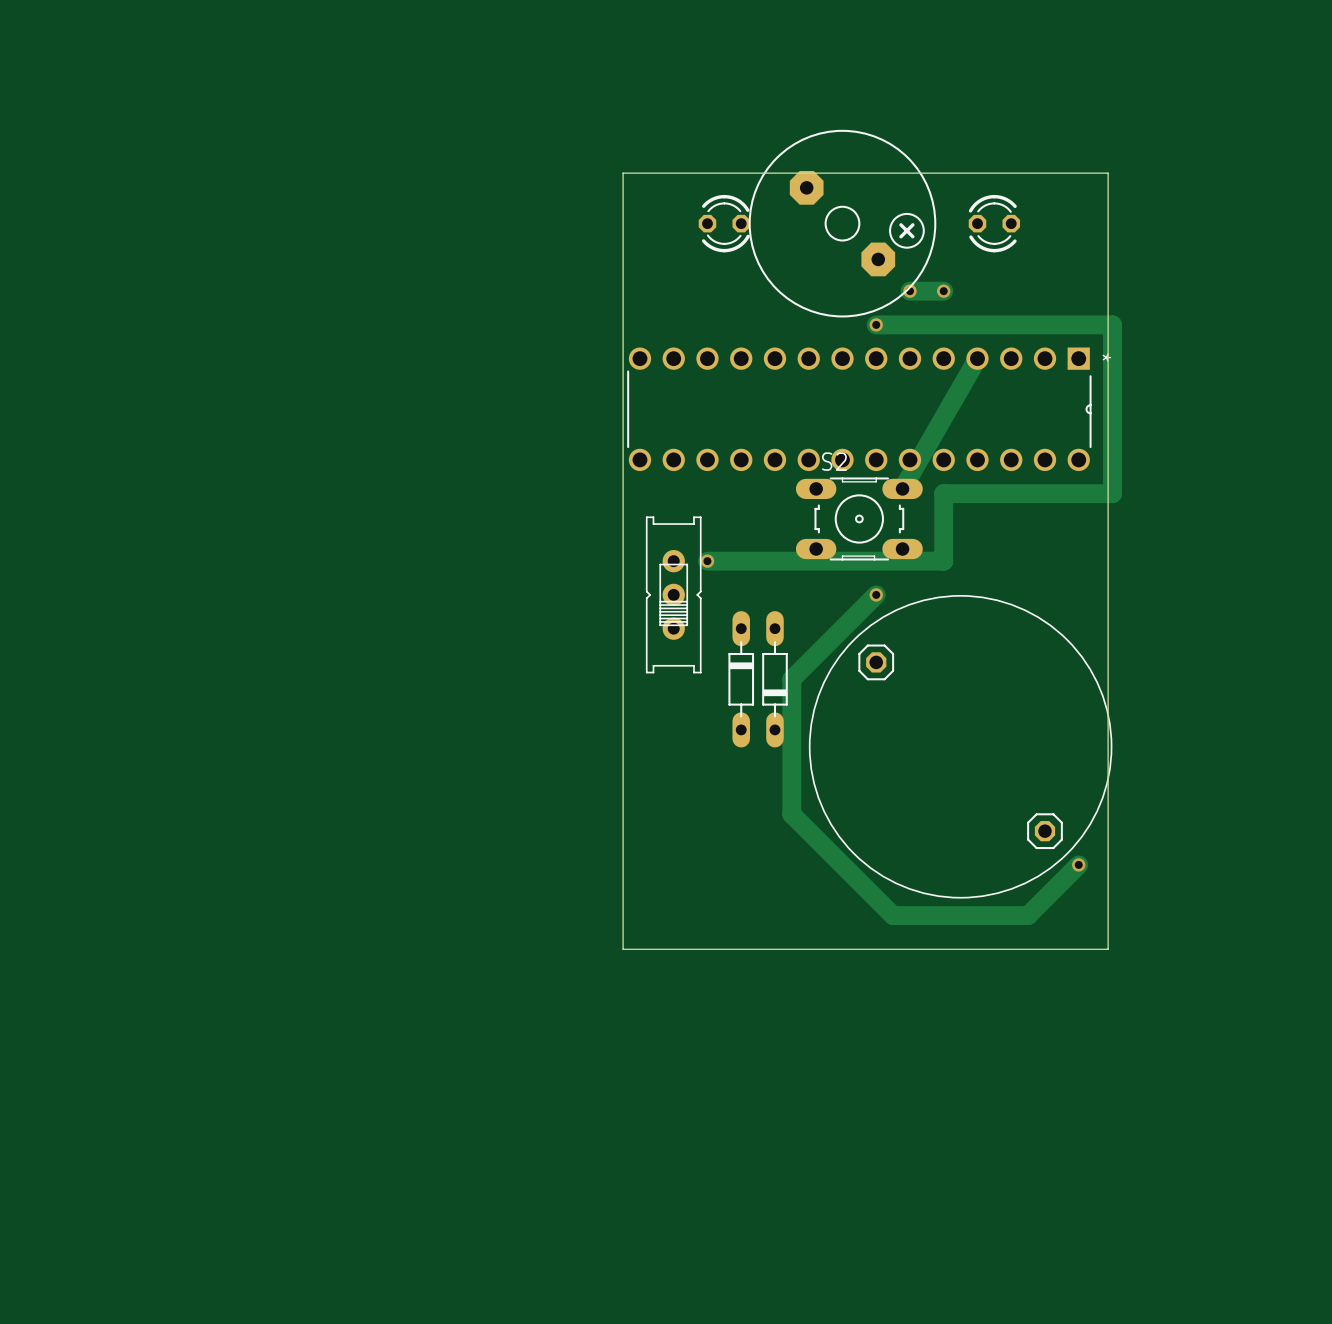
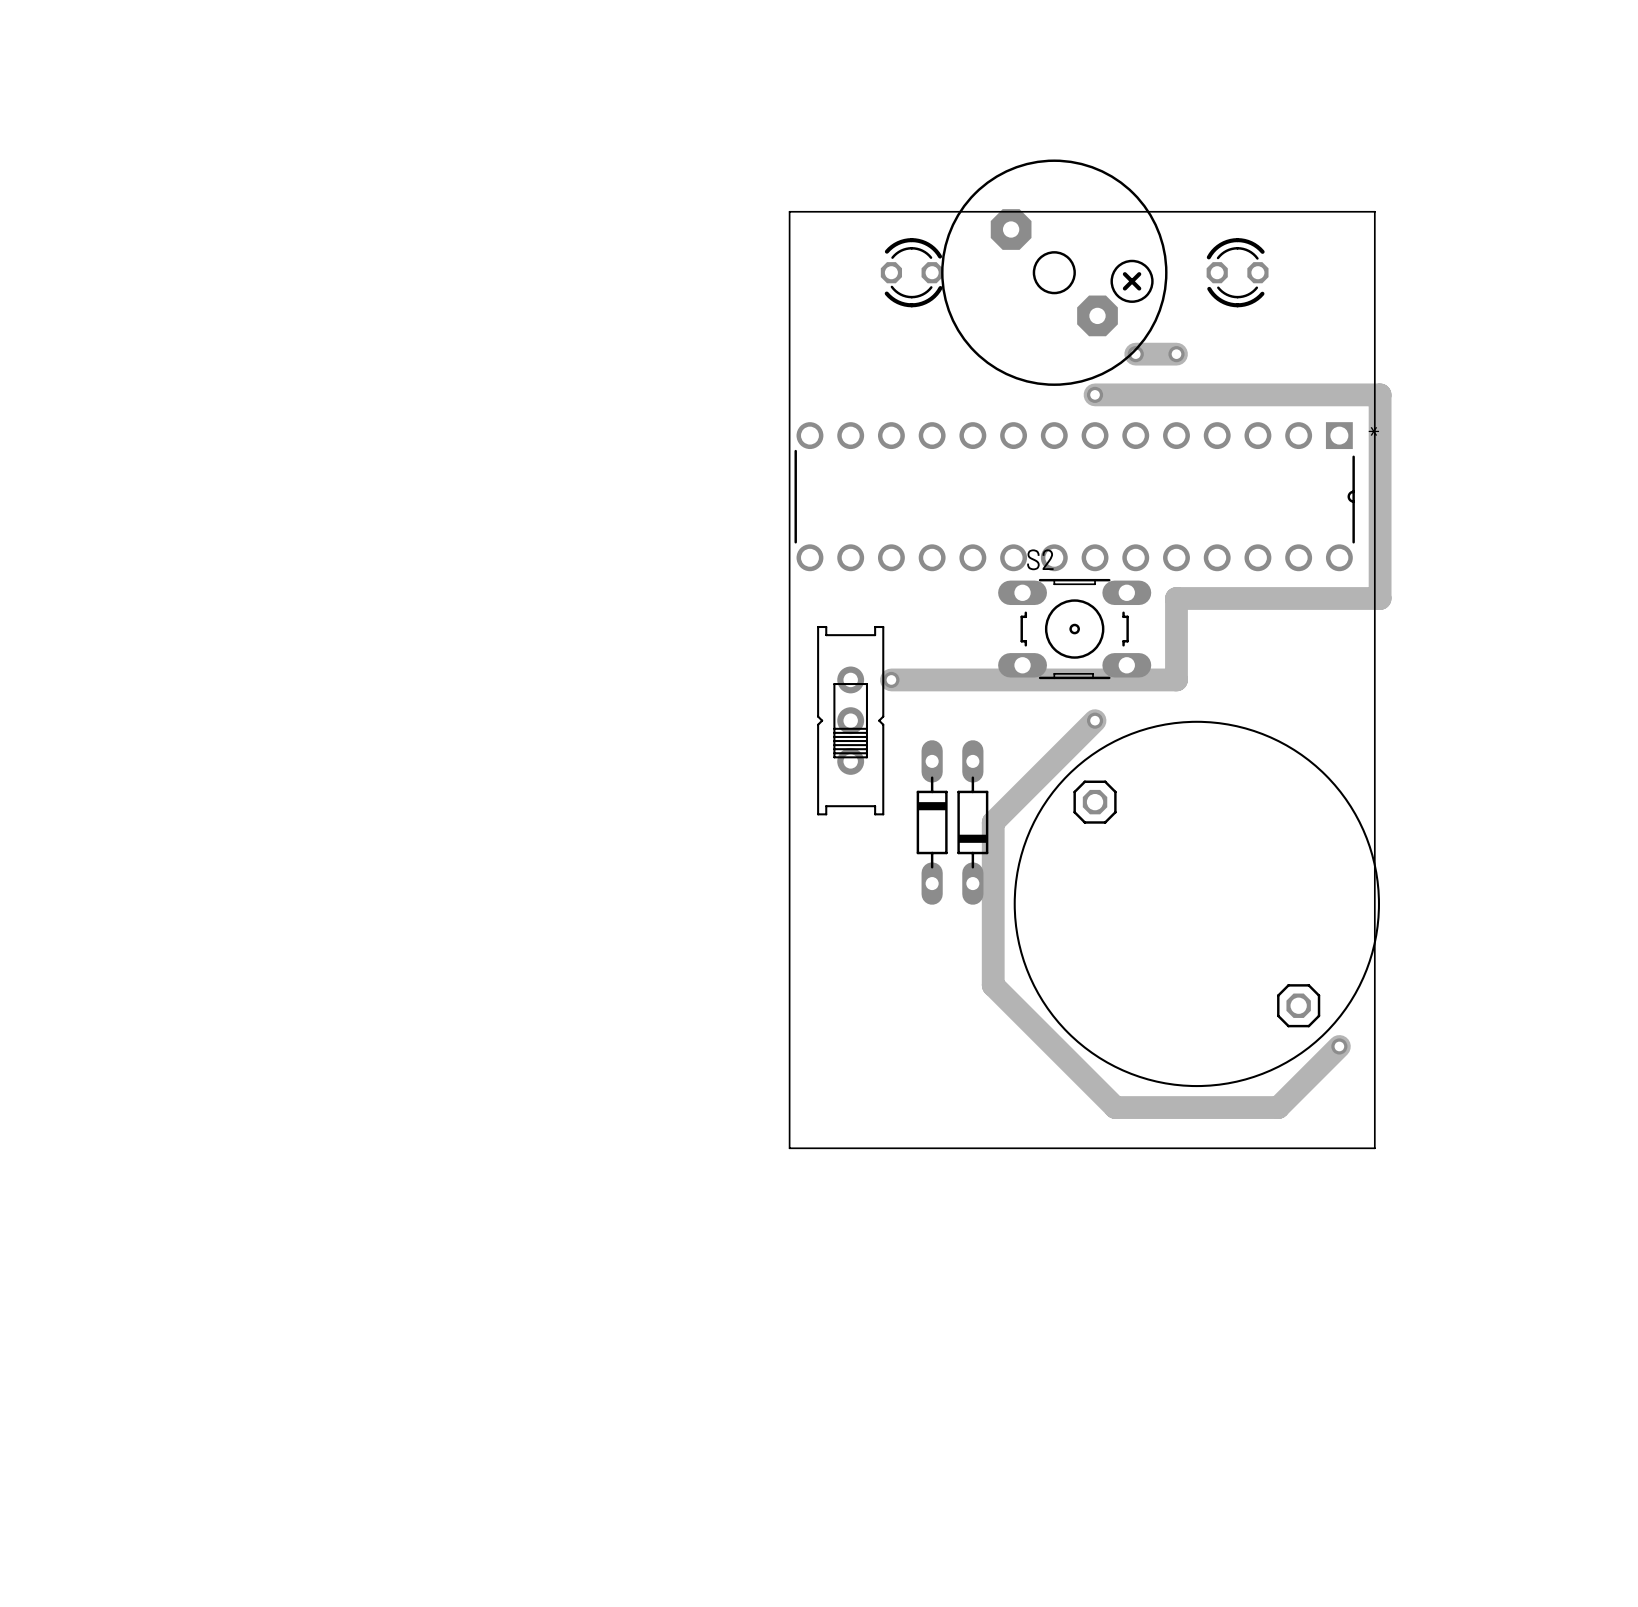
track: (977, 358) (902, 488) -> none

